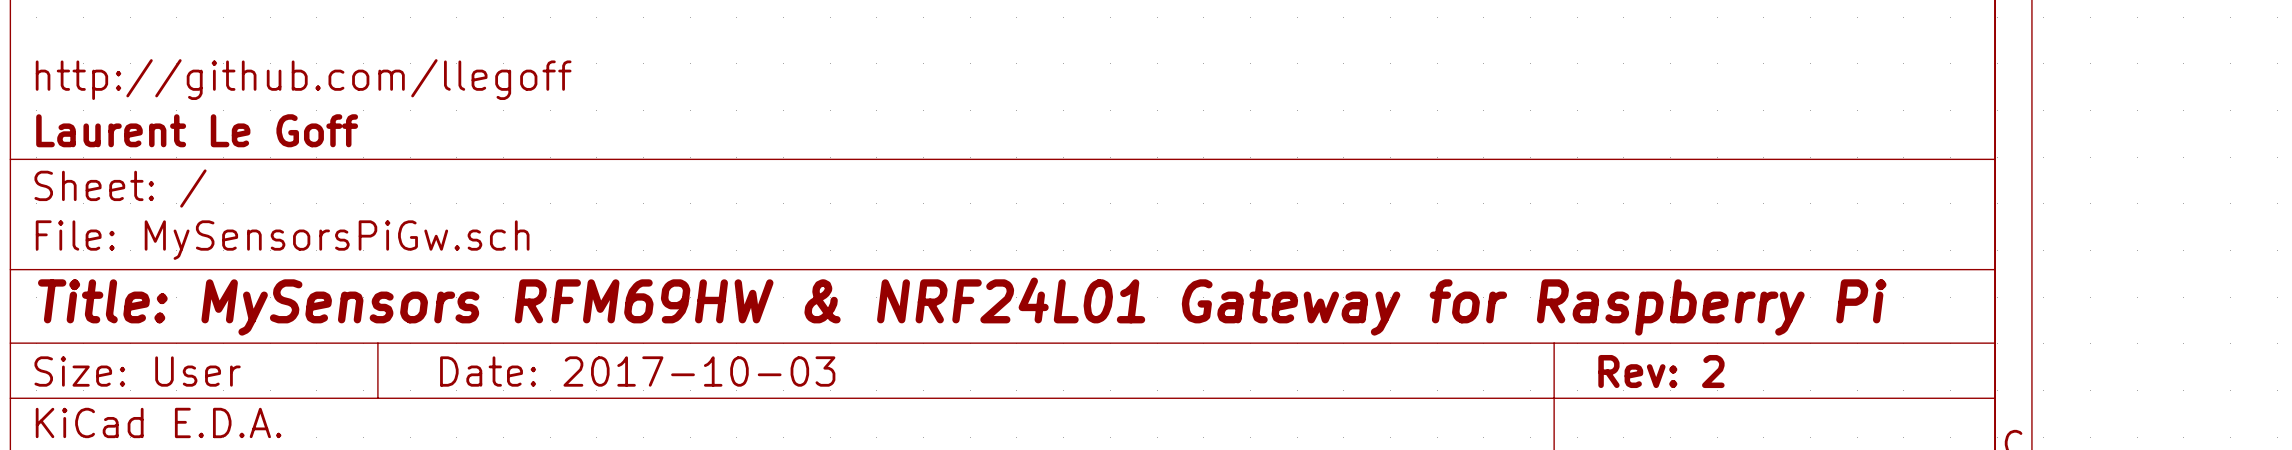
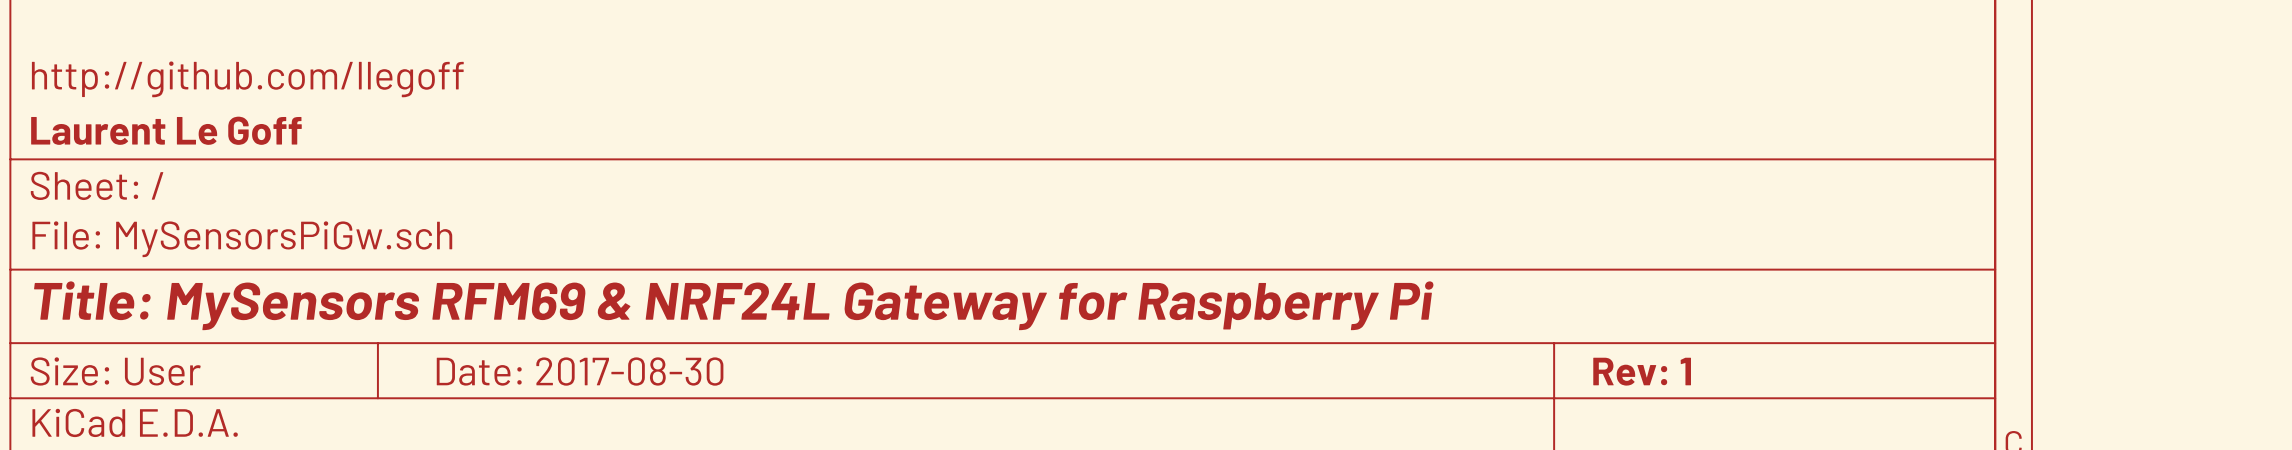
title block: Title: MySensors RFM69HW & NRF24L01 Gateway for Raspberry Pi (962, 306) -> Title: MySensors RFM69 & NRF24L Gateway for Raspberry Pi (733, 305)
title block: Date: 2017-10-03 (637, 371) -> Date: 2017-08-30 (580, 371)
title block: Rev: 2 (1661, 371) -> Rev: 1 (1642, 371)

